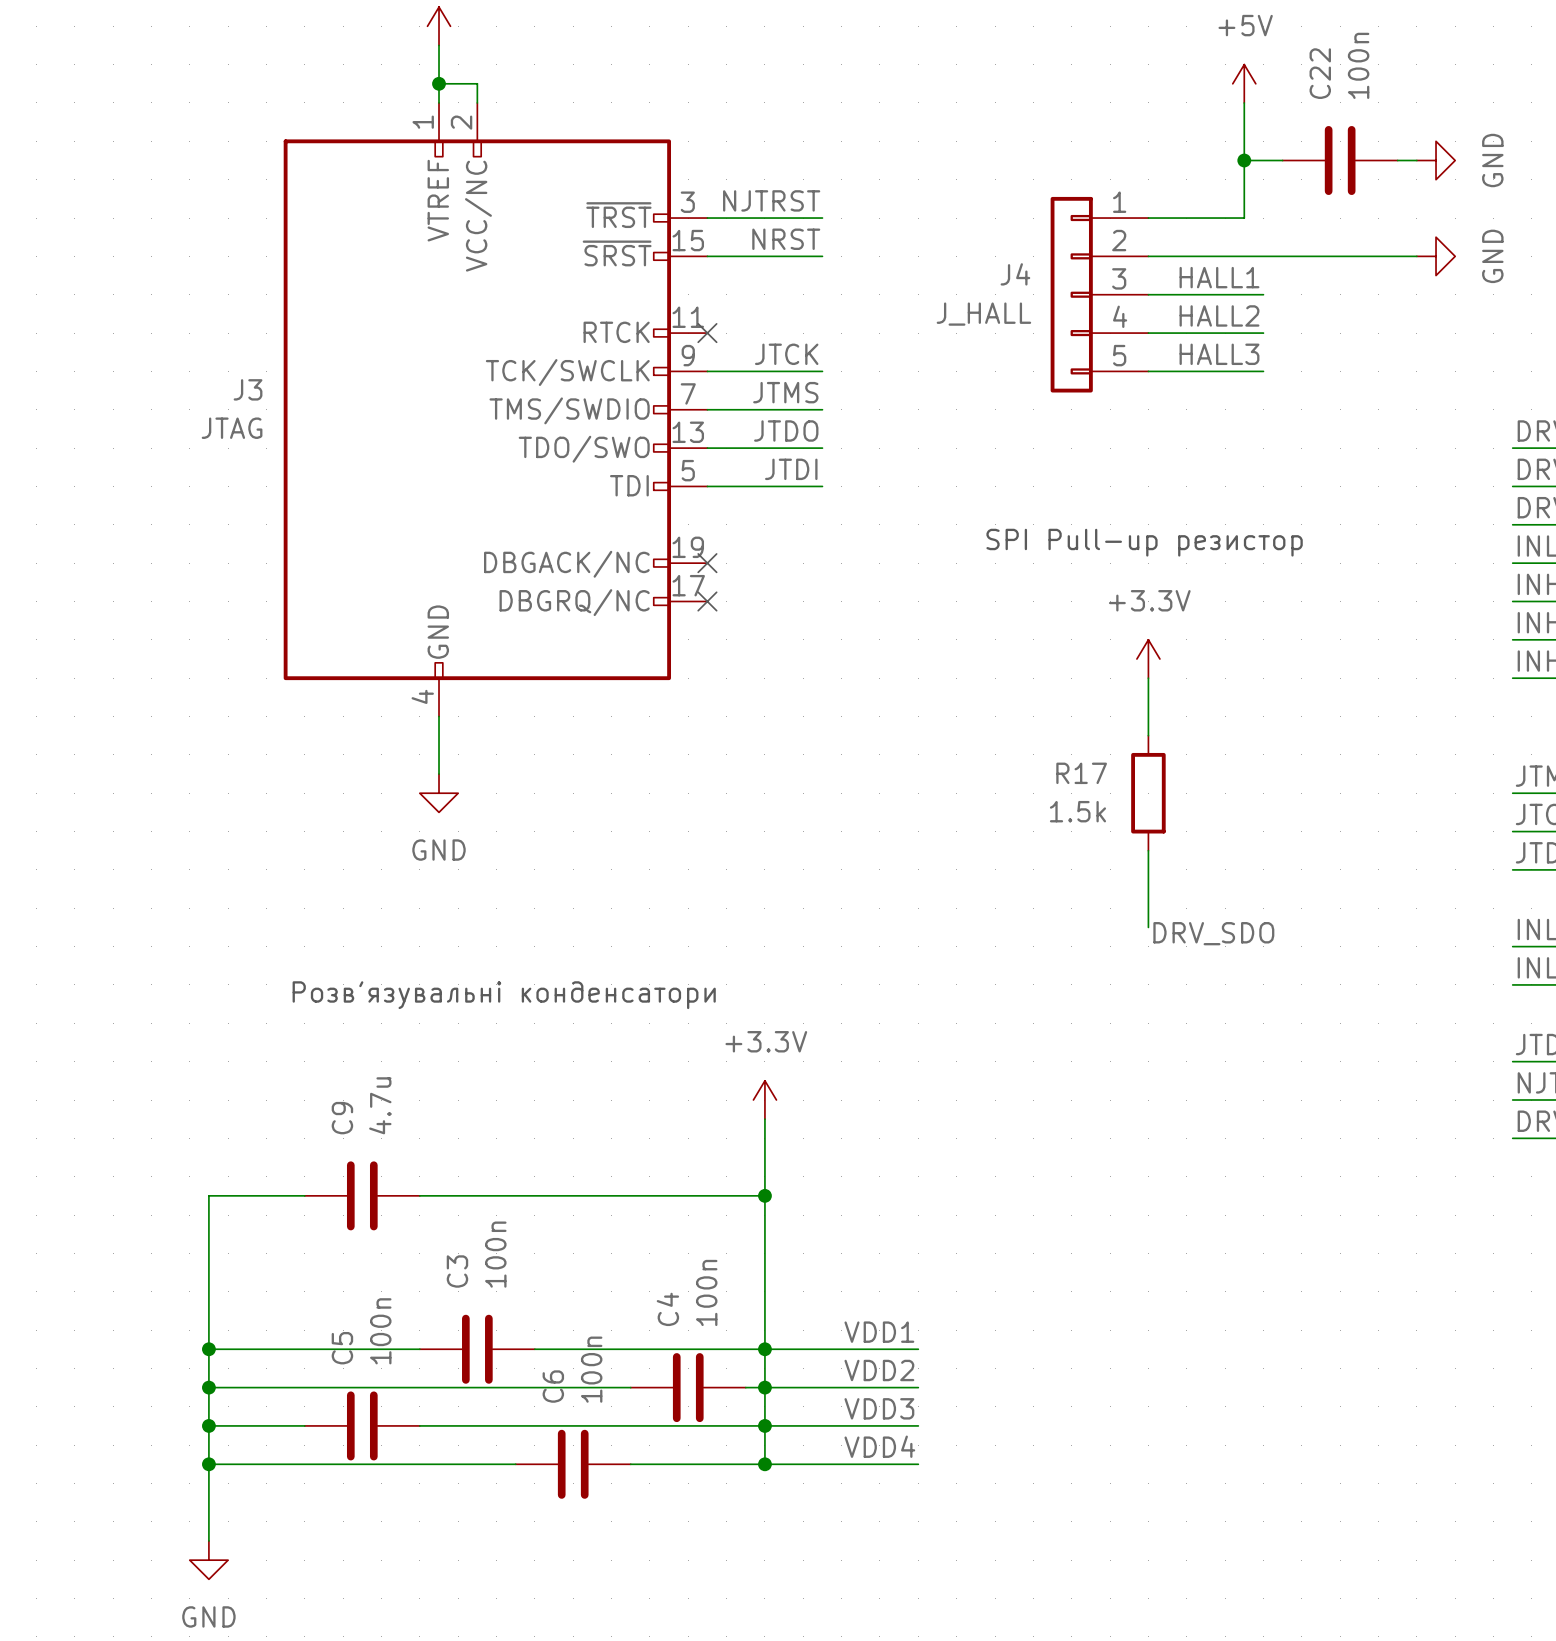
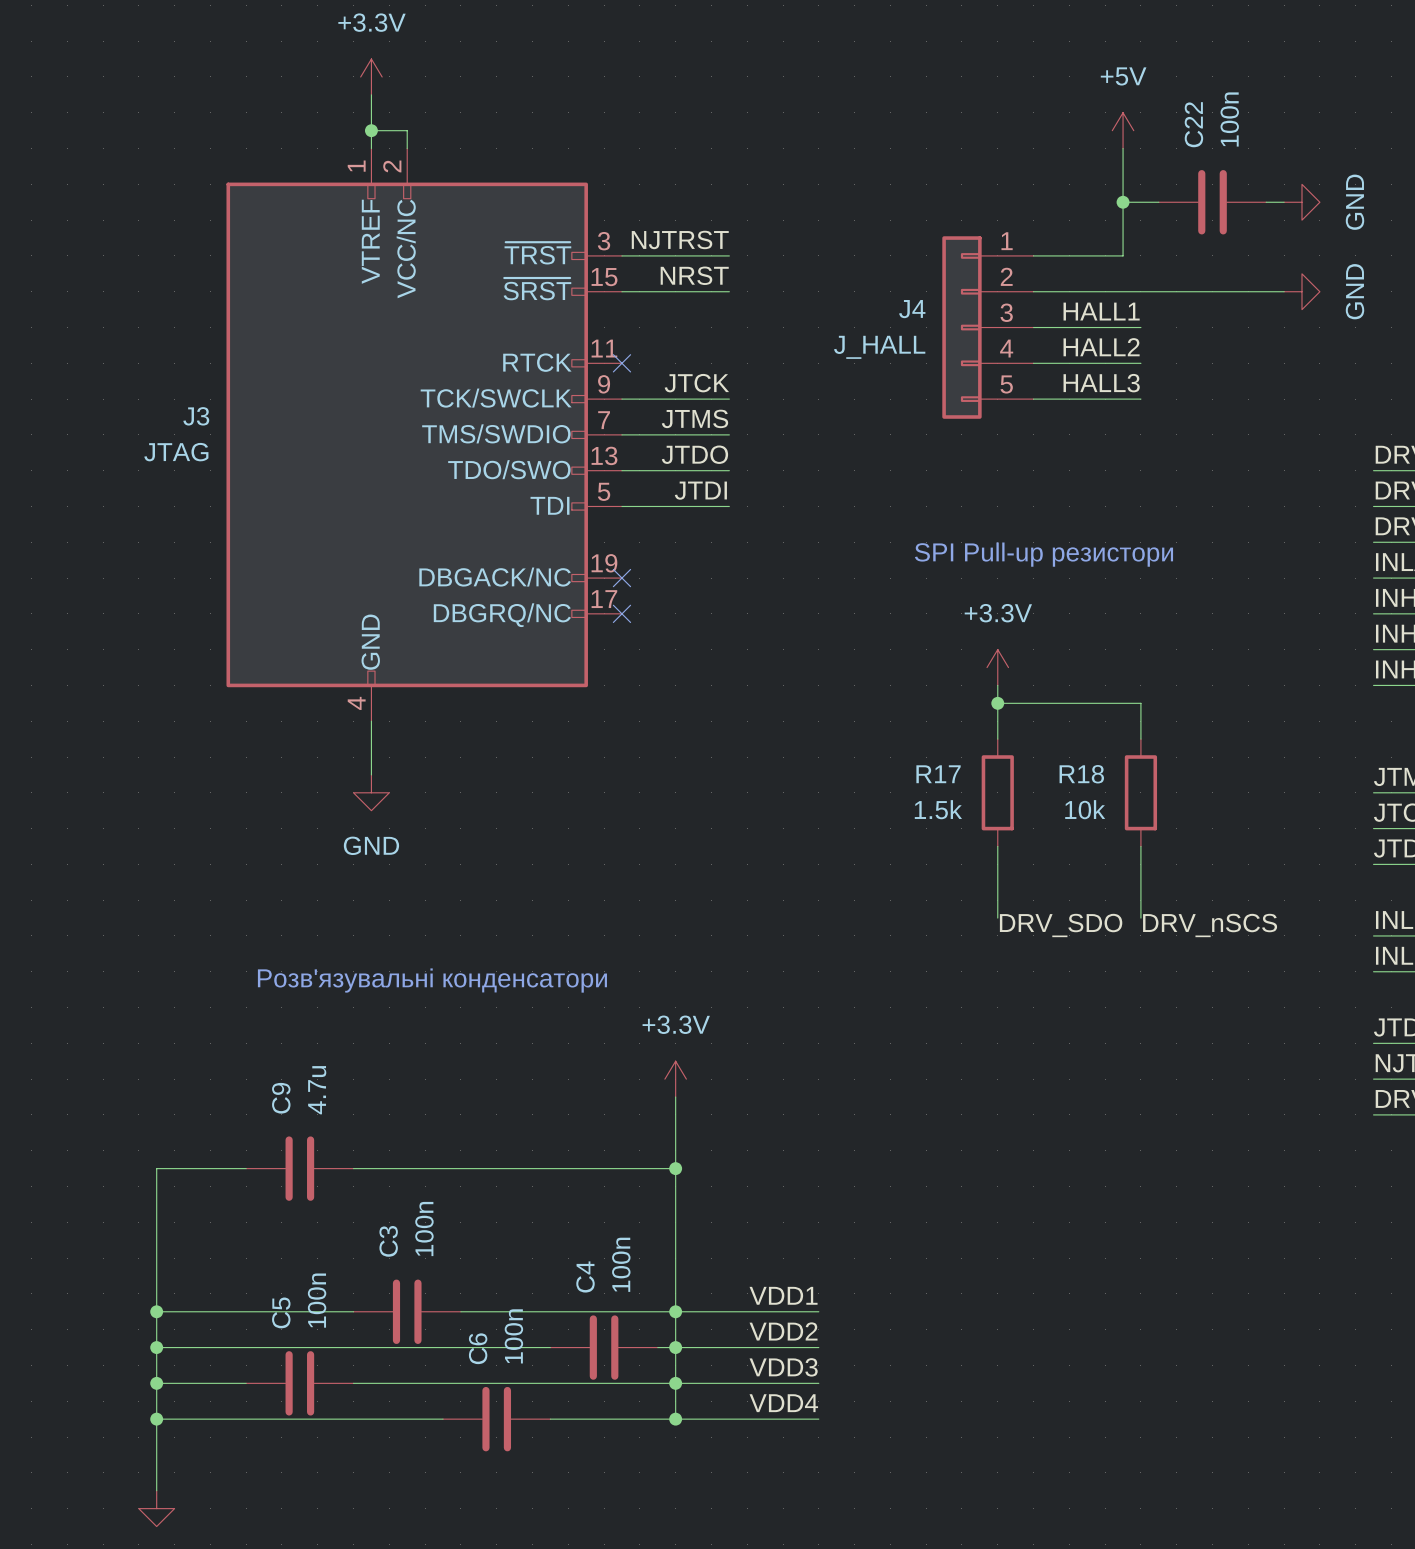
text: SPI Pull-up резистор (1144, 542) -> SPI Pull-up резистори (1043, 554)
power symbol position: +3.3V (1148, 659) -> +3.3V (997, 667)
wire: (1148, 678) (1148, 735) -> (997, 685) (997, 739)
wire: none -> (997, 703) (1140, 703) (1140, 739)
junction: none -> (997, 703)
R17 position: (1148, 793) -> (997, 792)
R18: none -> 10k (1140, 792)
wire: (1148, 850) (1148, 927) -> (997, 846) (997, 918)
wire: none -> (1140, 846) (1140, 918)
label position: DRV_SDO (1213, 933) -> DRV_SDO (1061, 925)
label: none -> DRV_nSCS (1210, 925)

